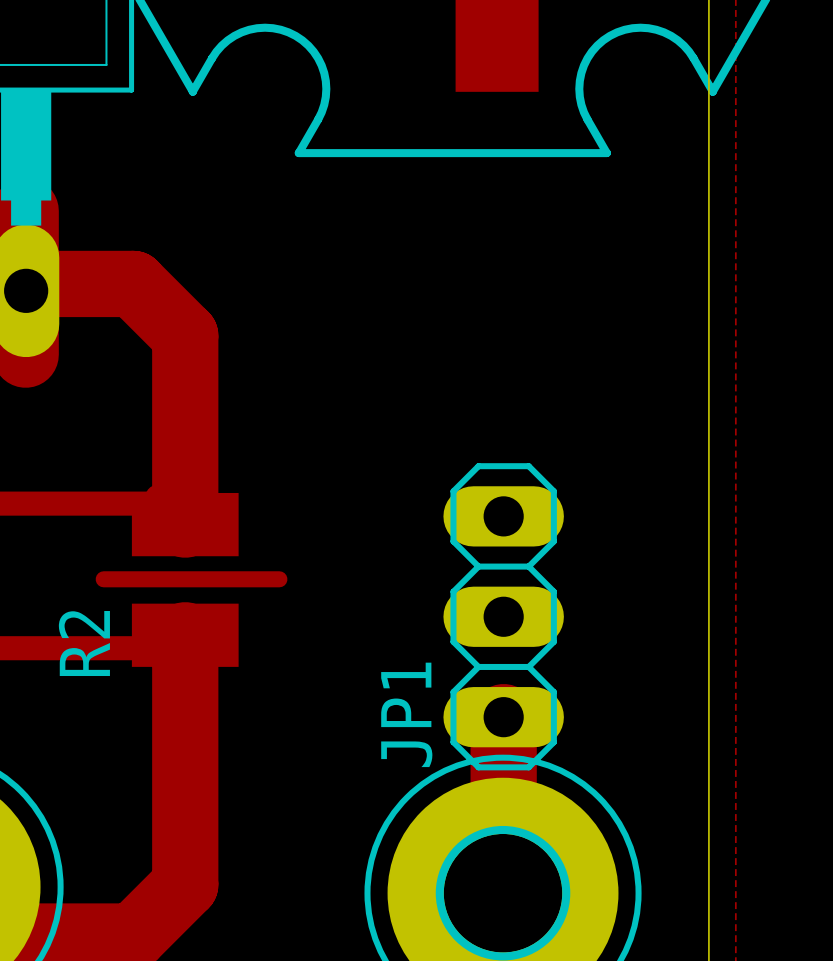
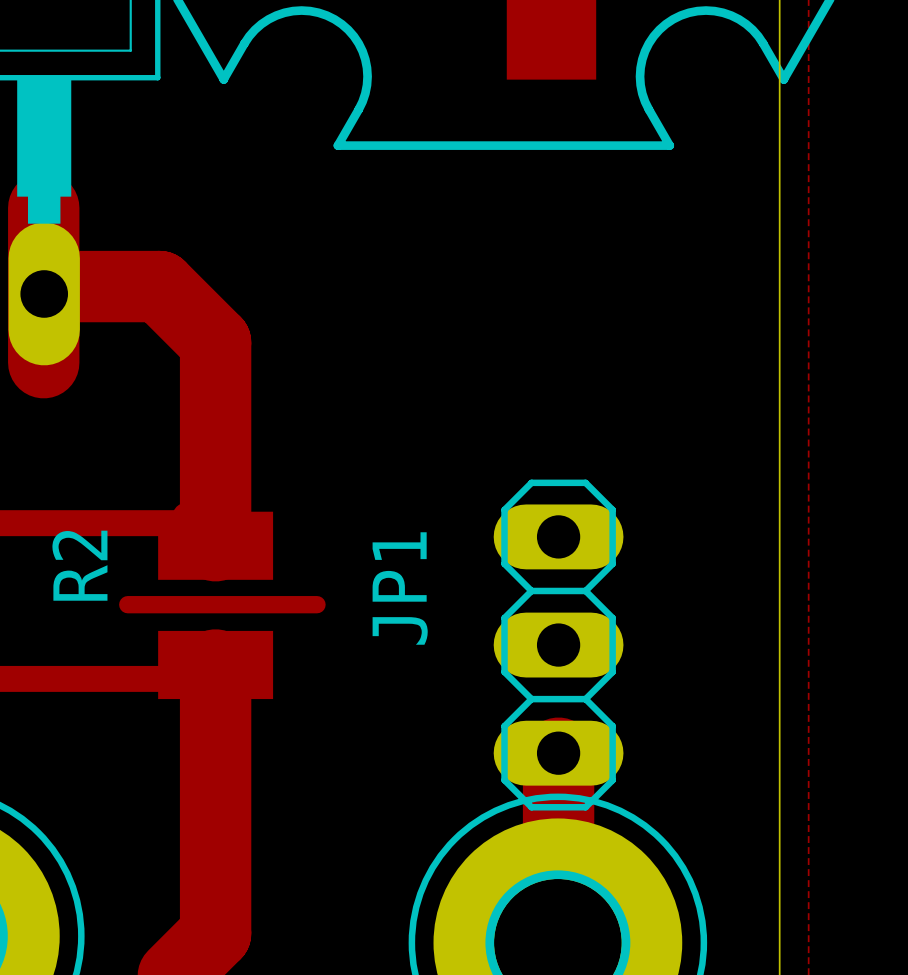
R2 name position: R2 (84, 643) -> R2 (79, 565)
JP1 name position: JP1 (406, 714) -> JP1 (400, 588)

